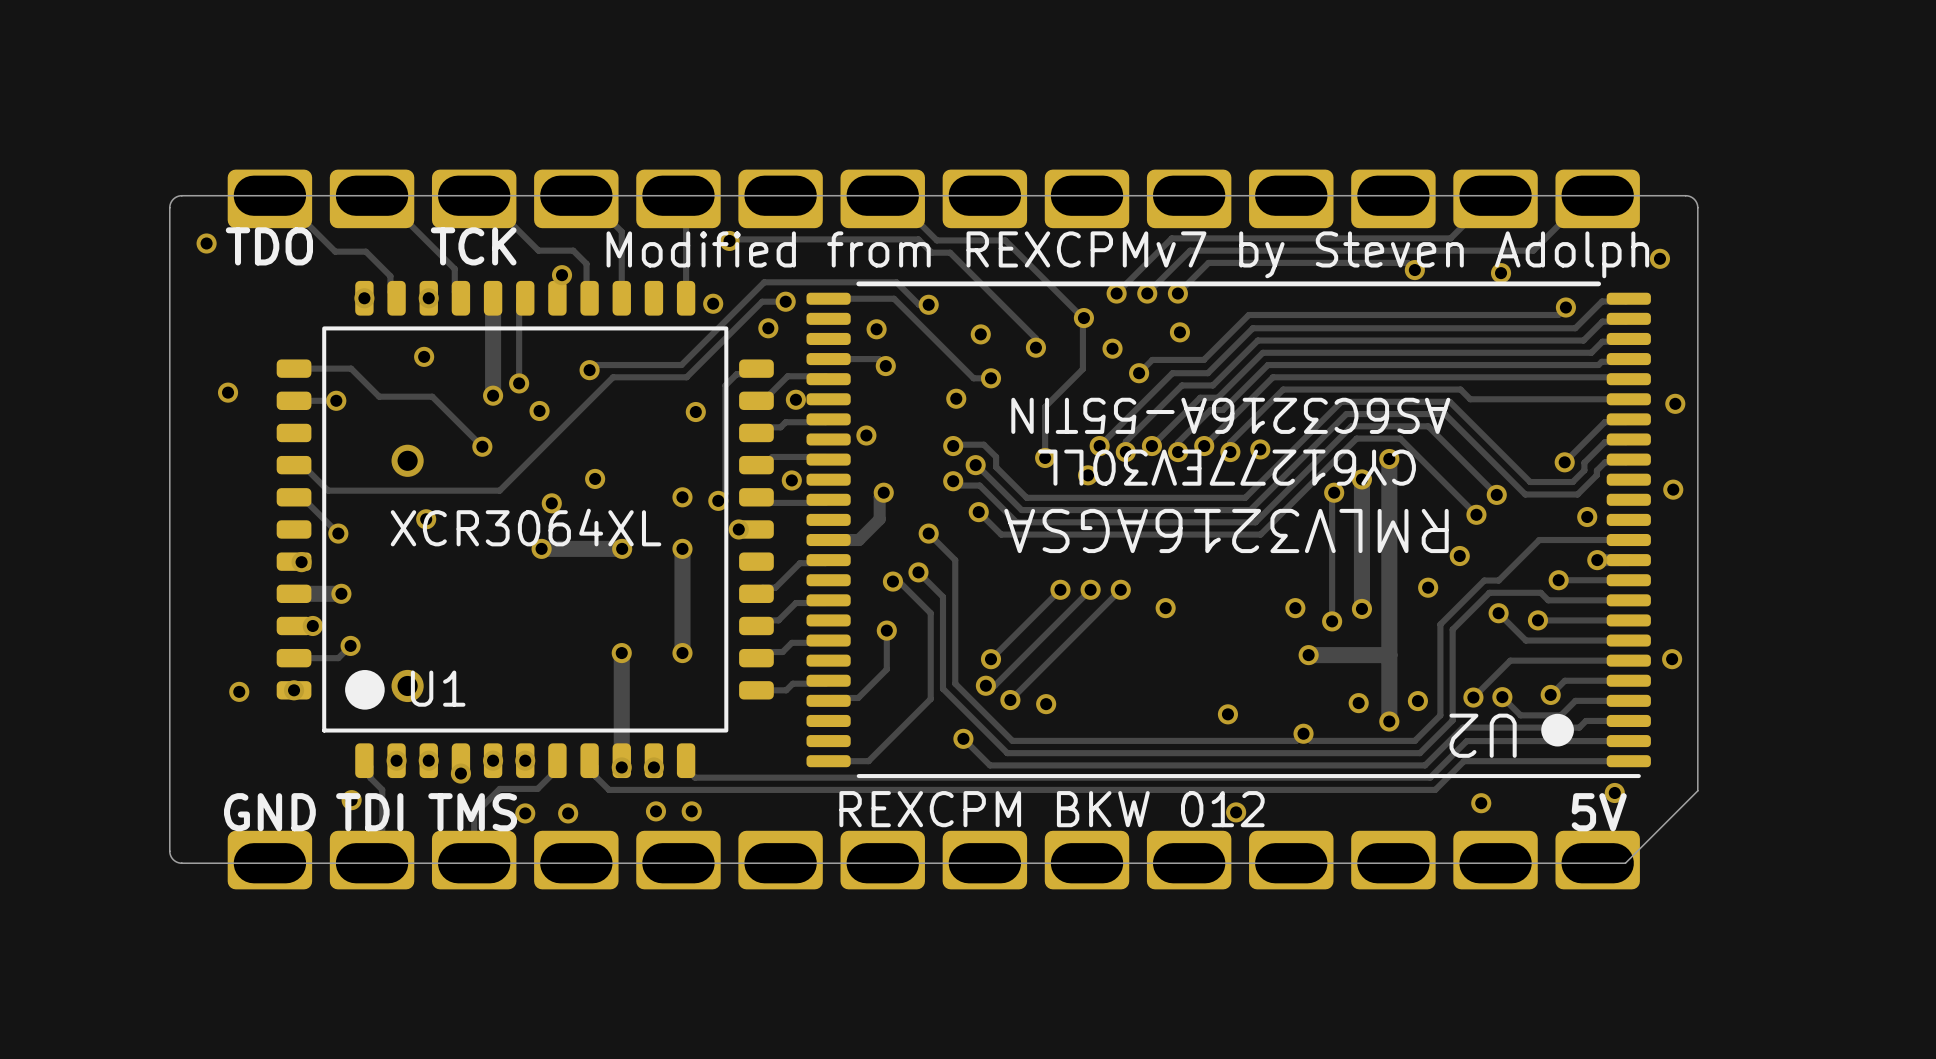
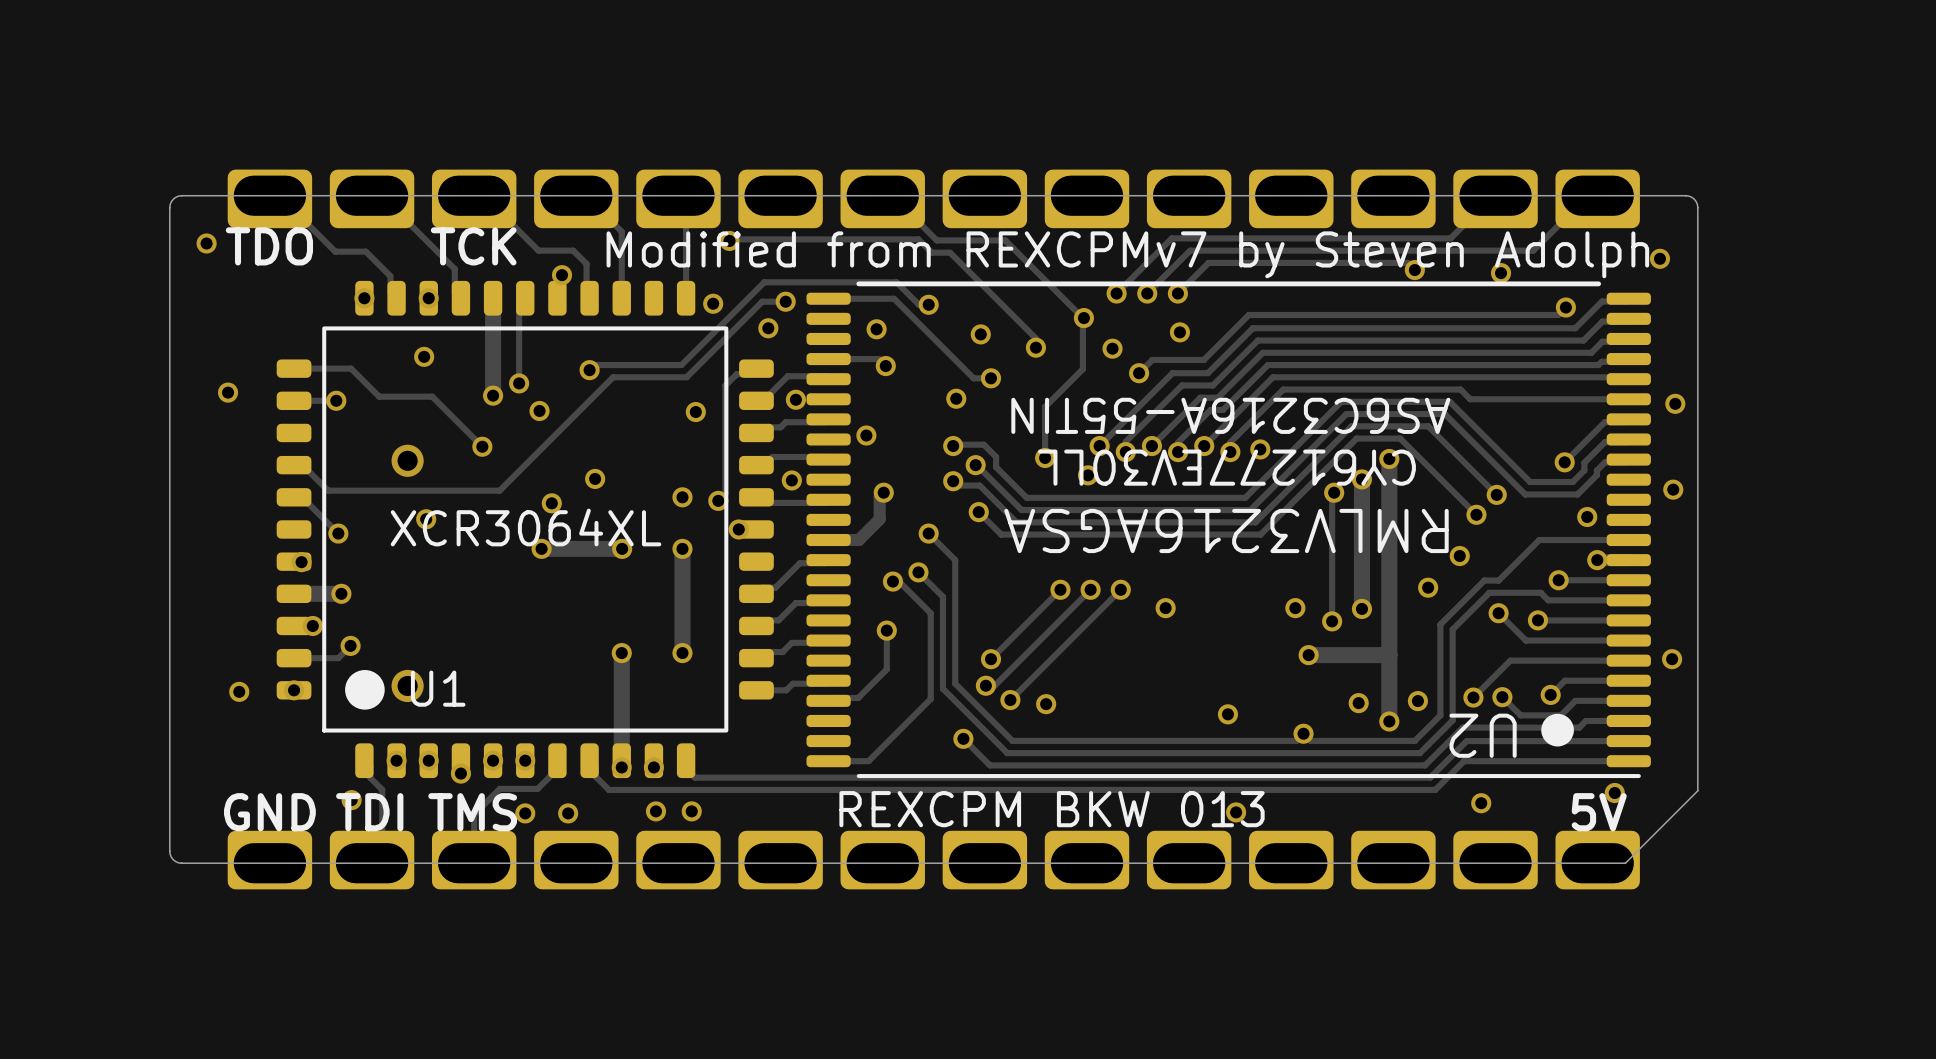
text: REXCPM BKW 012 (1052, 809) -> REXCPM BKW 013 (1052, 809)

